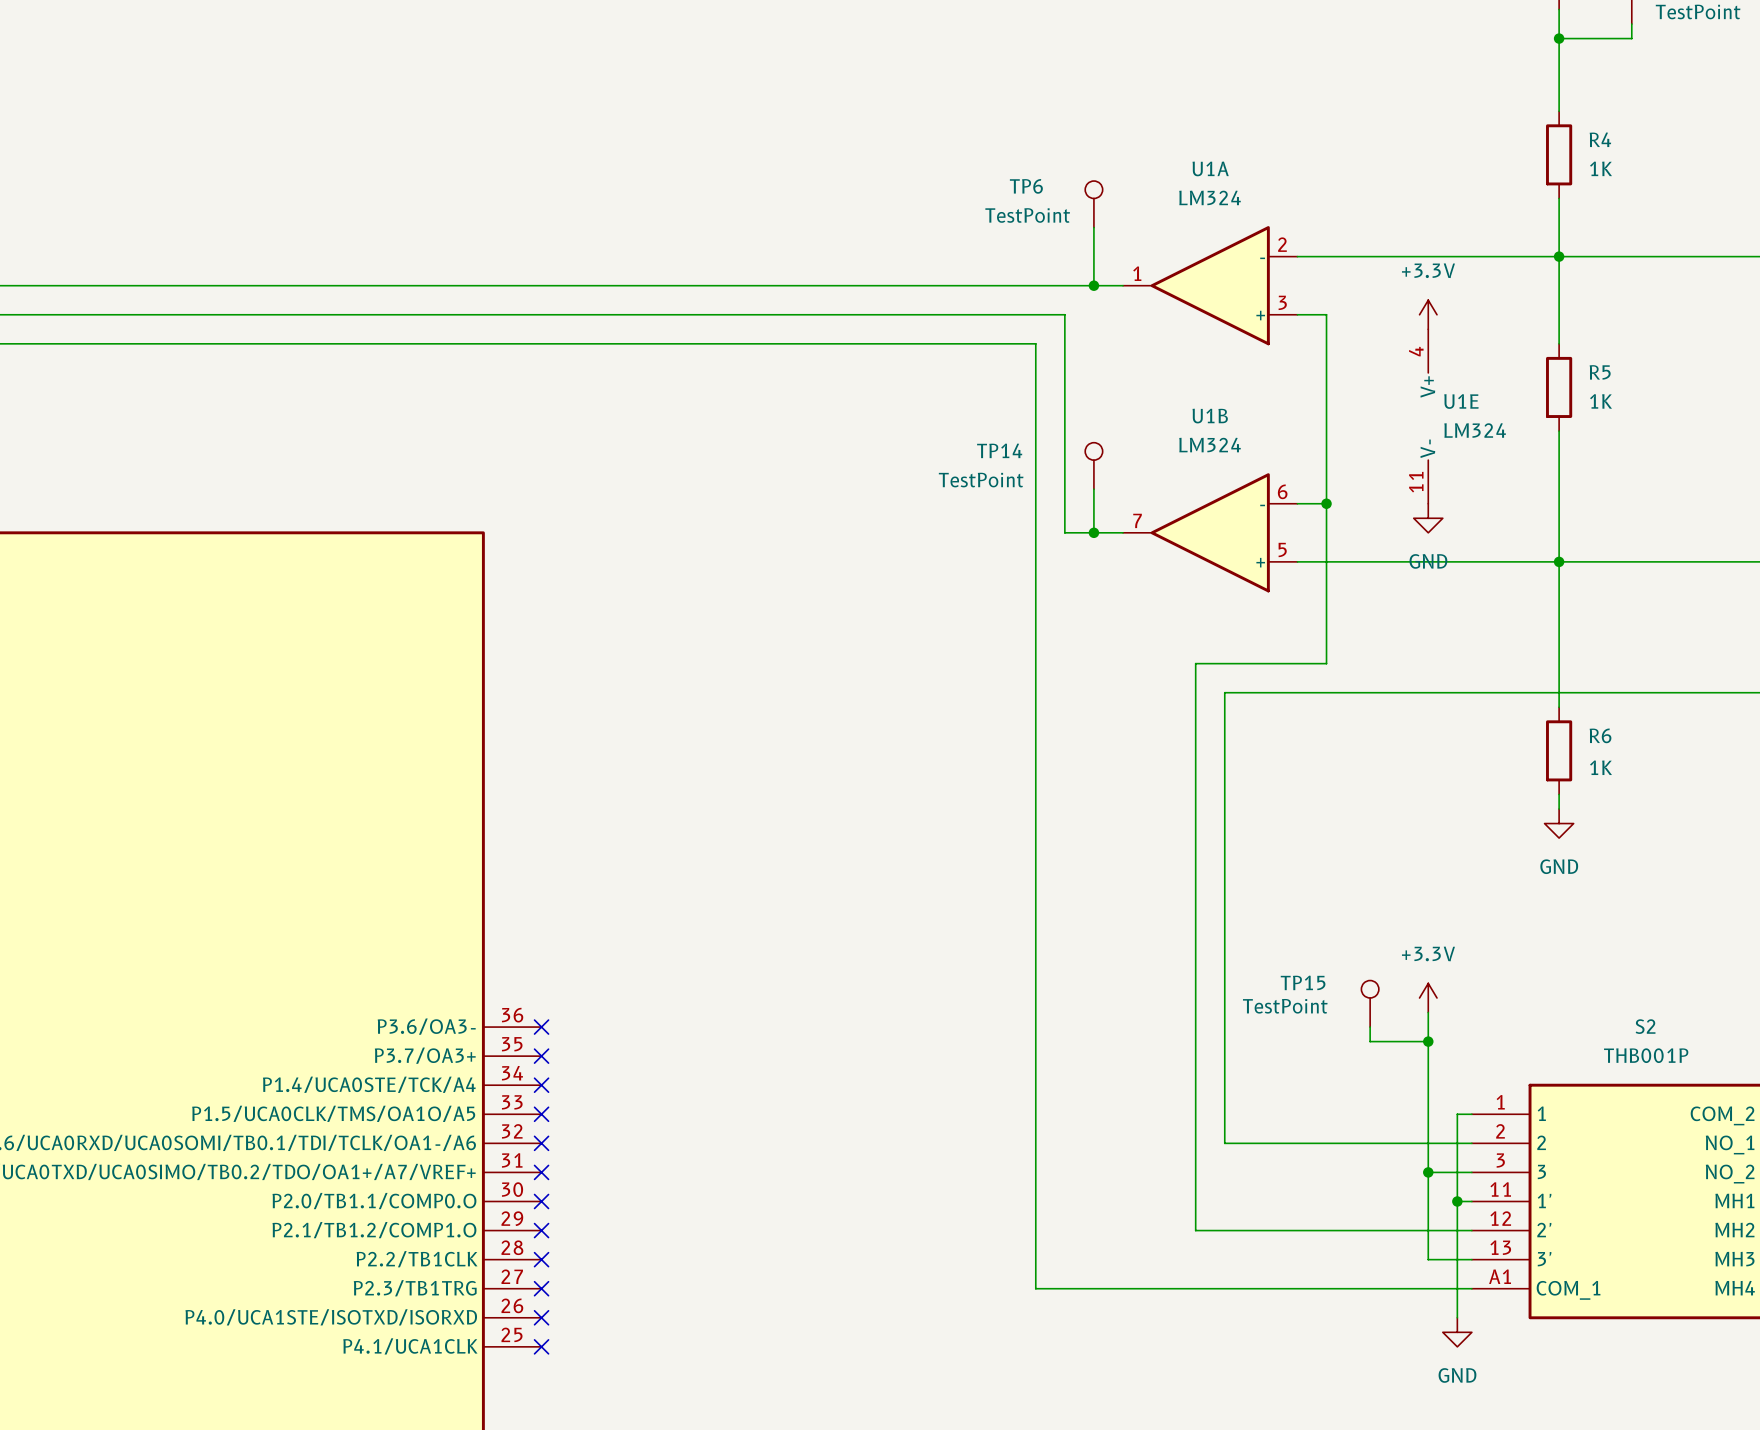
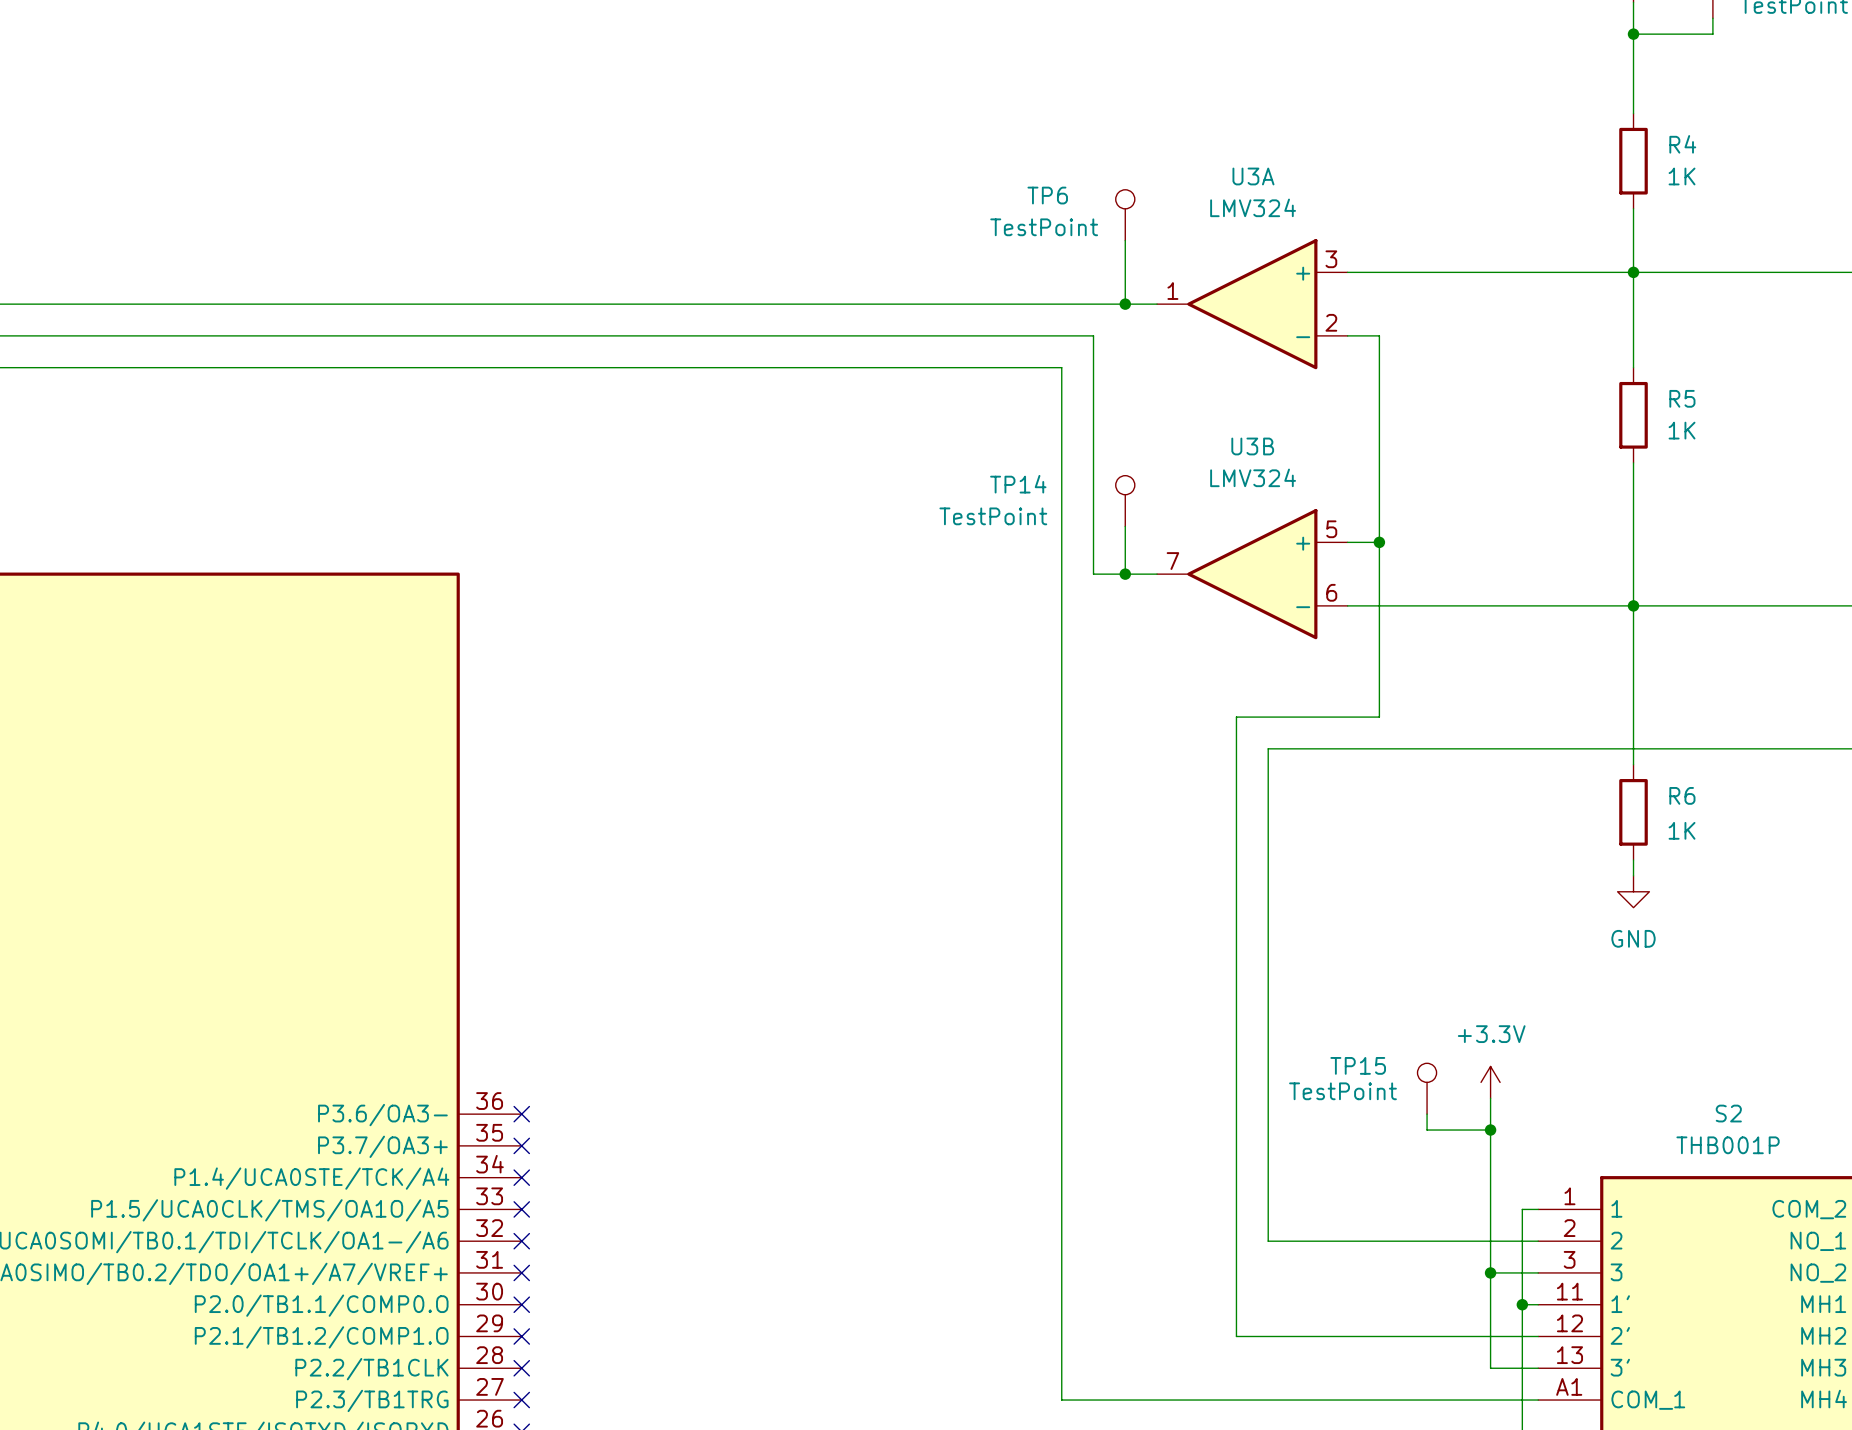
U1A name: U1A (1210, 168) -> U3A (1253, 176)
U1A value: LM324 (1210, 197) -> LMV324 (1253, 207)
U1A flip: as is (1210, 285) -> up-down (1252, 304)
power symbol: +3.3V (1428, 314) -> none
U1B name: U1B (1210, 416) -> U3B (1252, 446)
U1E: LM324 (1428, 416) -> none
U1B value: LM324 (1210, 445) -> LMV324 (1253, 477)
power symbol: GND (1428, 518) -> none
U1B flip: as is (1210, 532) -> up-down (1252, 574)

